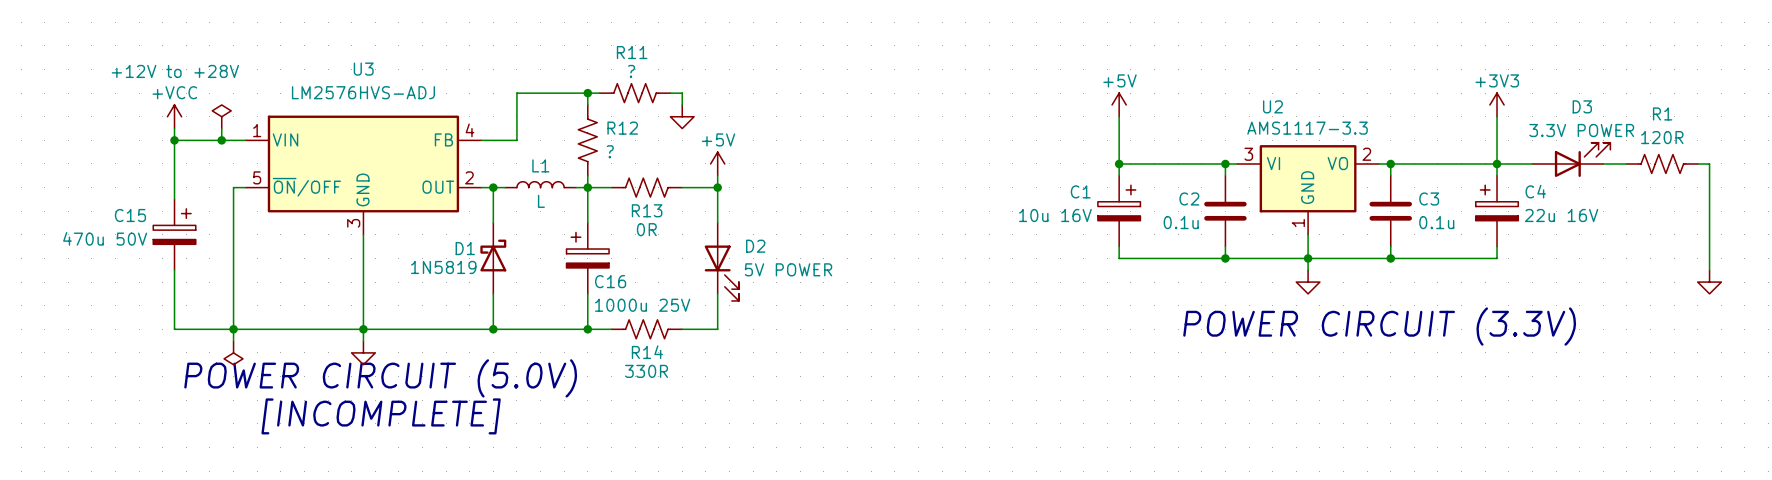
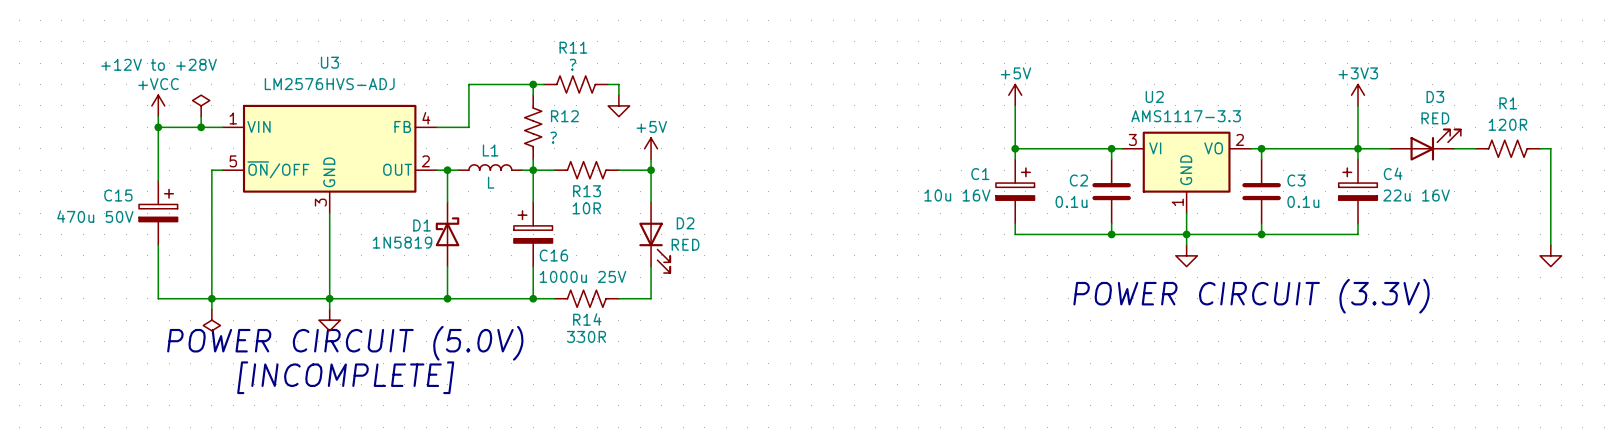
D3 value: 3.3V POWER (1581, 130) -> RED (1435, 118)
R13 value: 0R (646, 229) -> 10R (586, 208)
D2 value: 5V POWER (788, 269) -> RED (685, 244)

